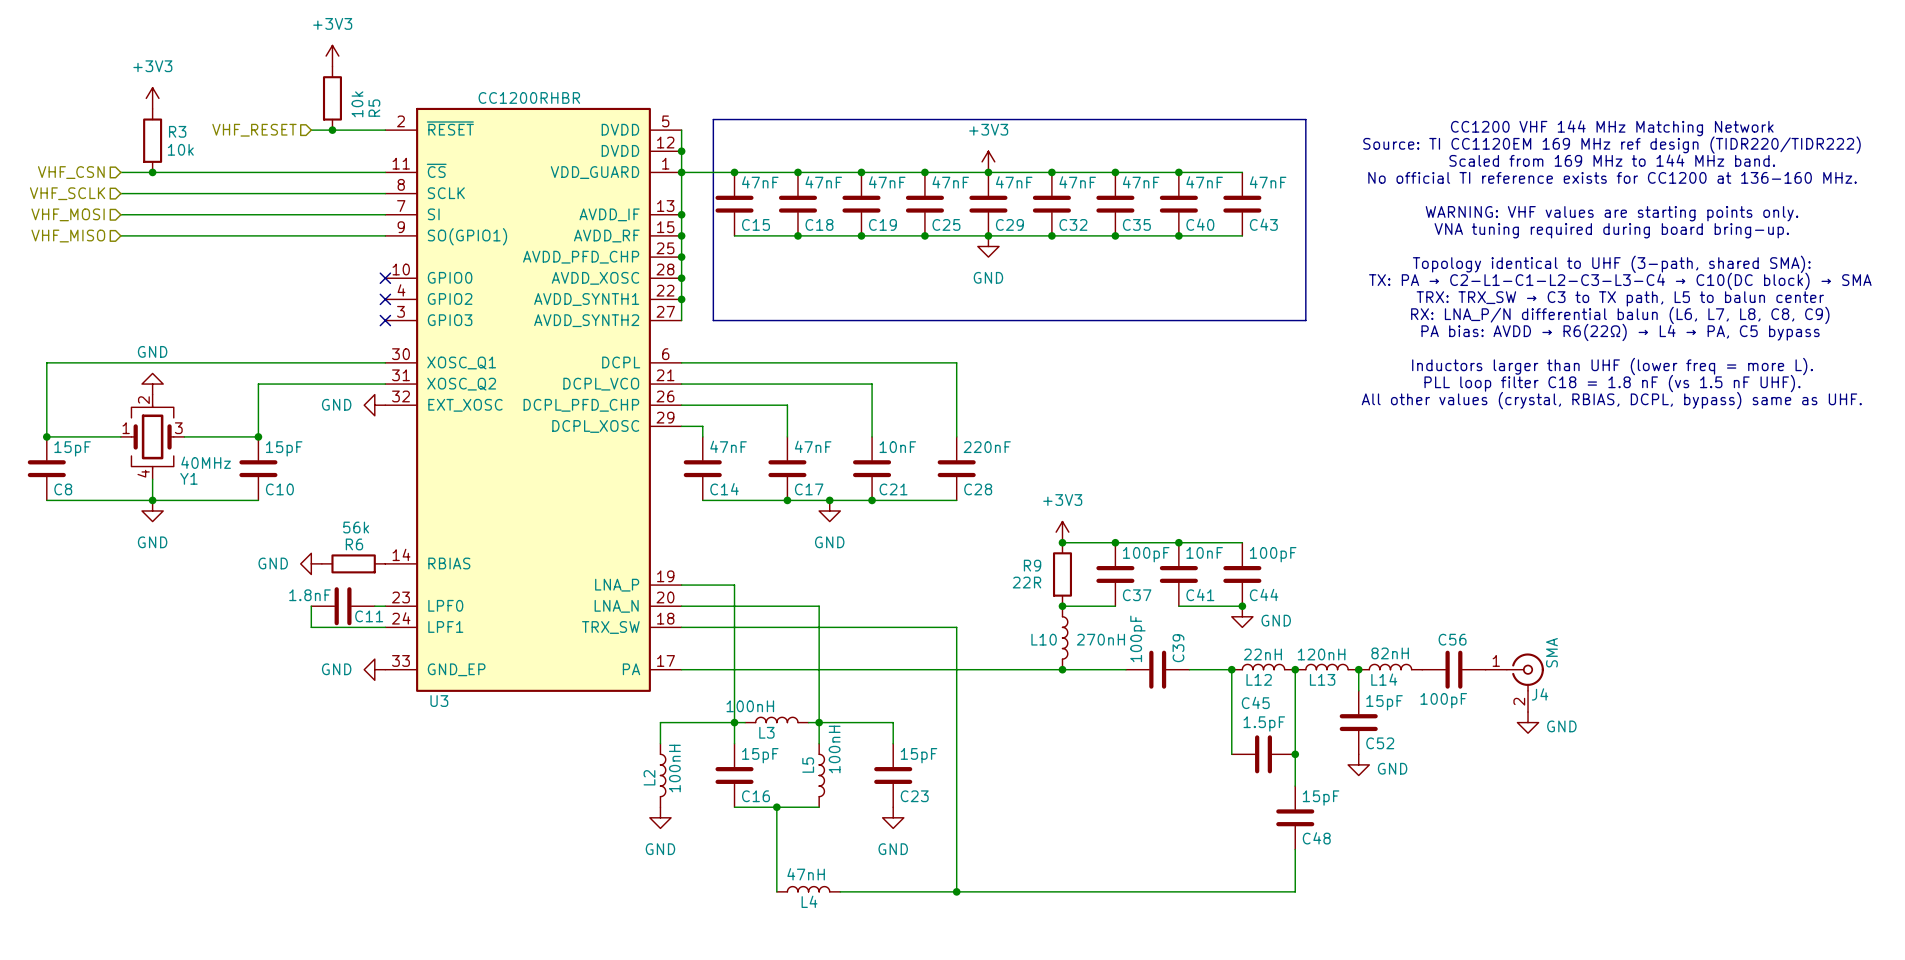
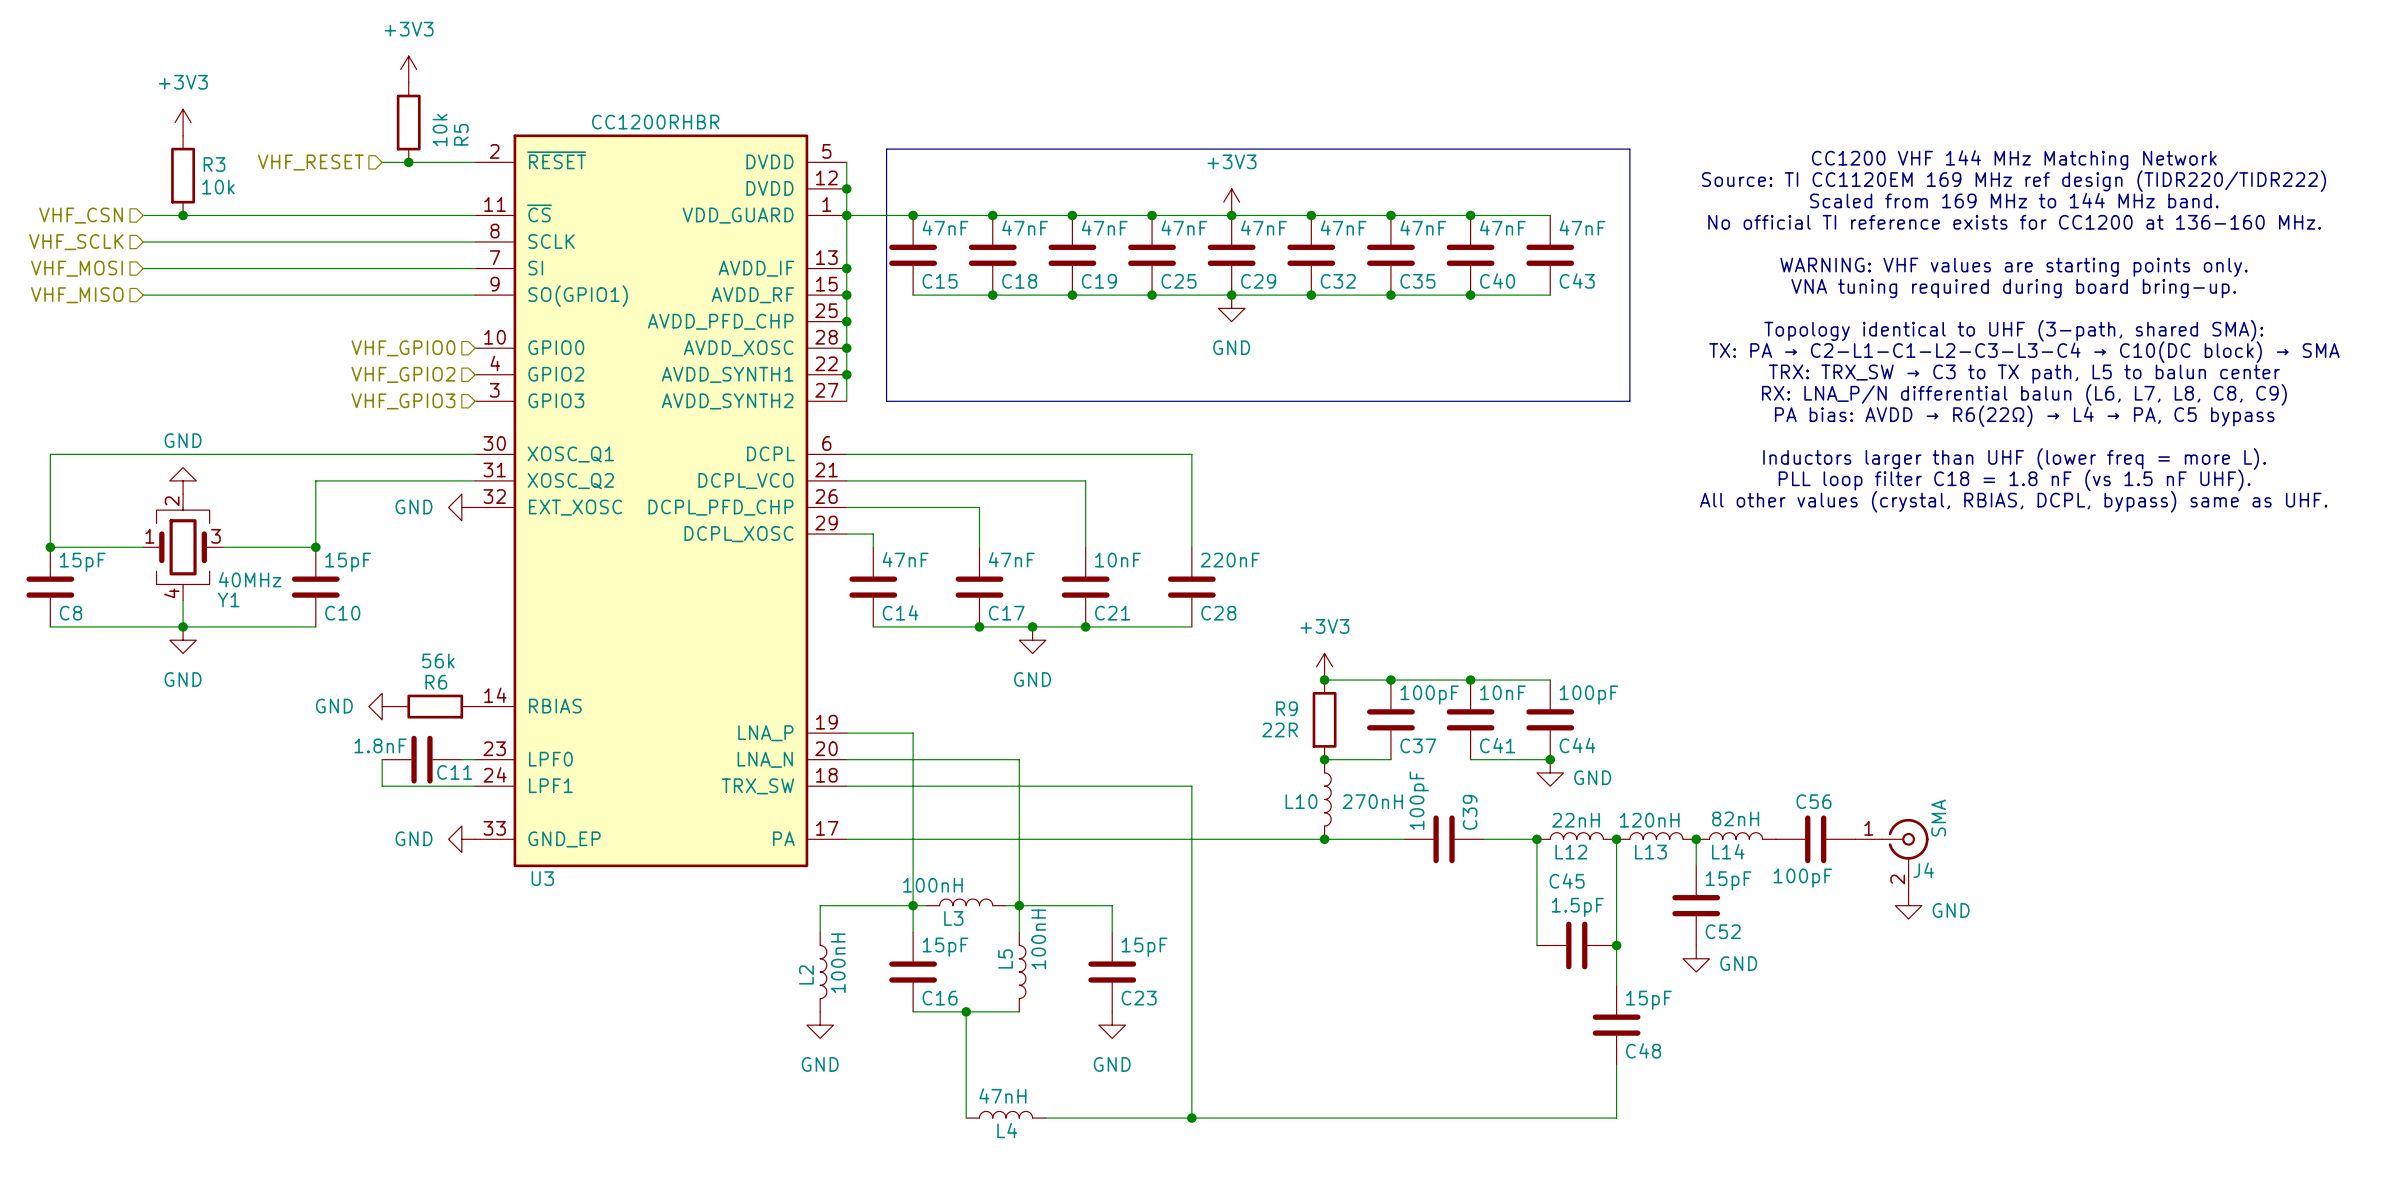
hierarchical label: none -> VHF_GPIO0 (403, 348)
no-connect mark: (385, 278) -> none
hierarchical label: none -> VHF_GPIO2 (403, 374)
no-connect mark: (385, 299) -> none
hierarchical label: none -> VHF_GPIO3 (403, 401)
no-connect mark: (385, 320) -> none

